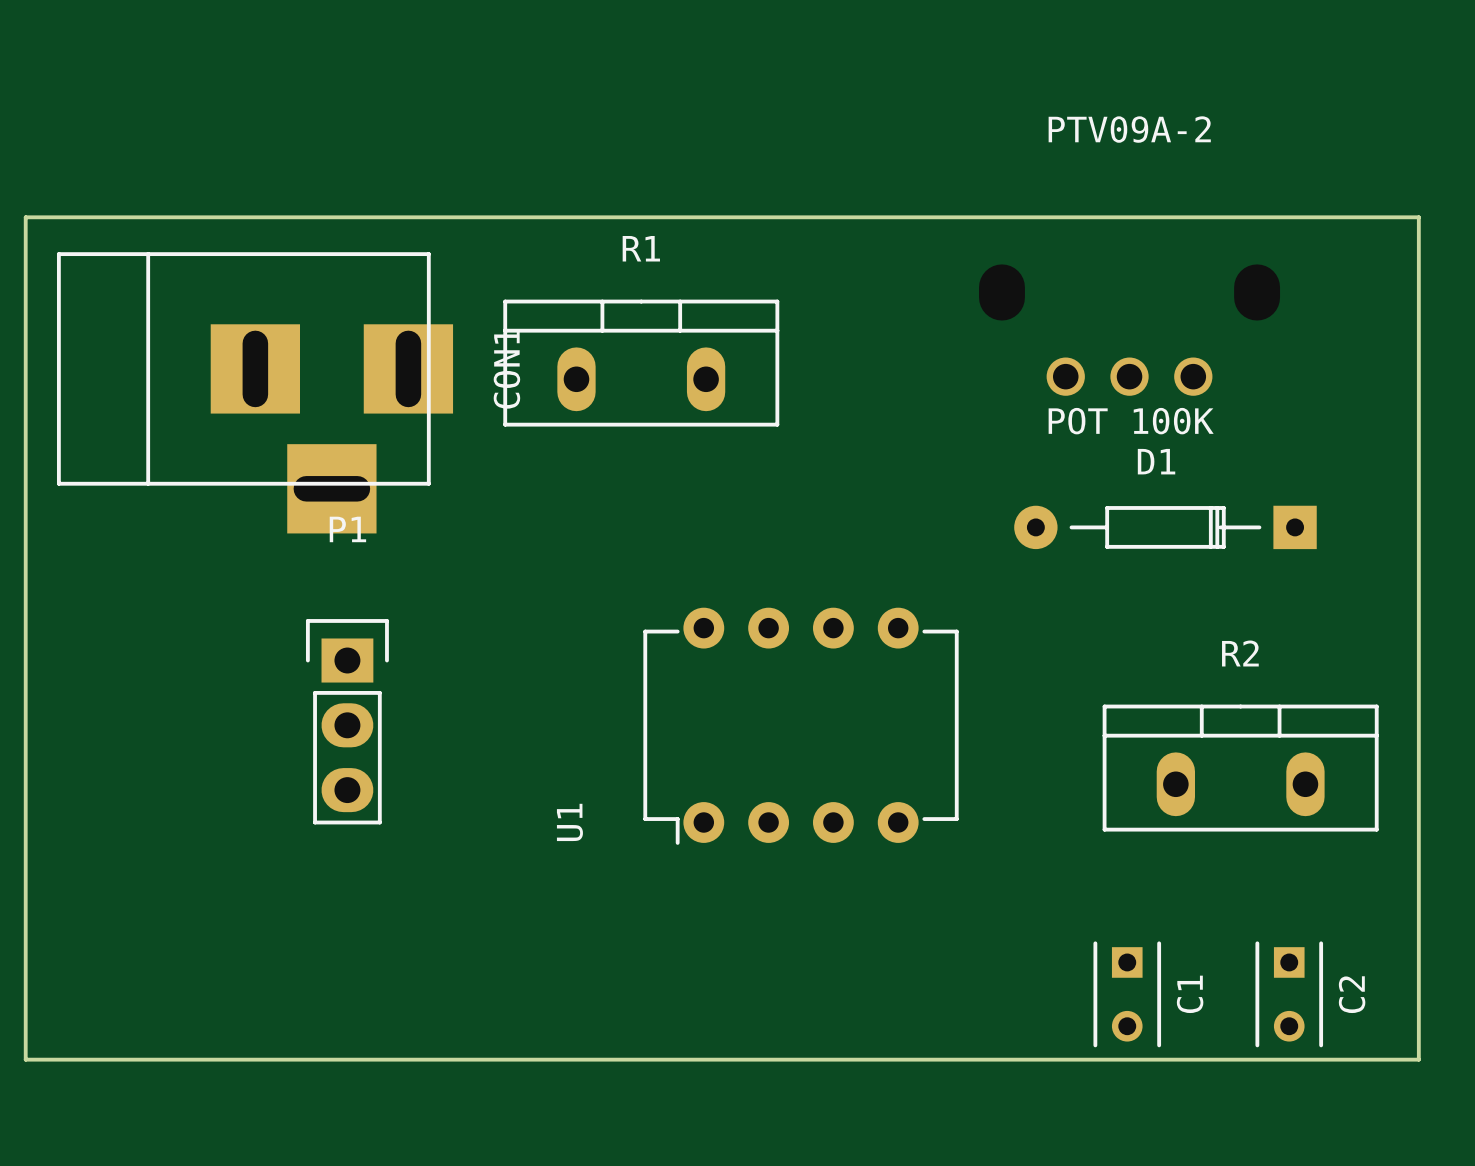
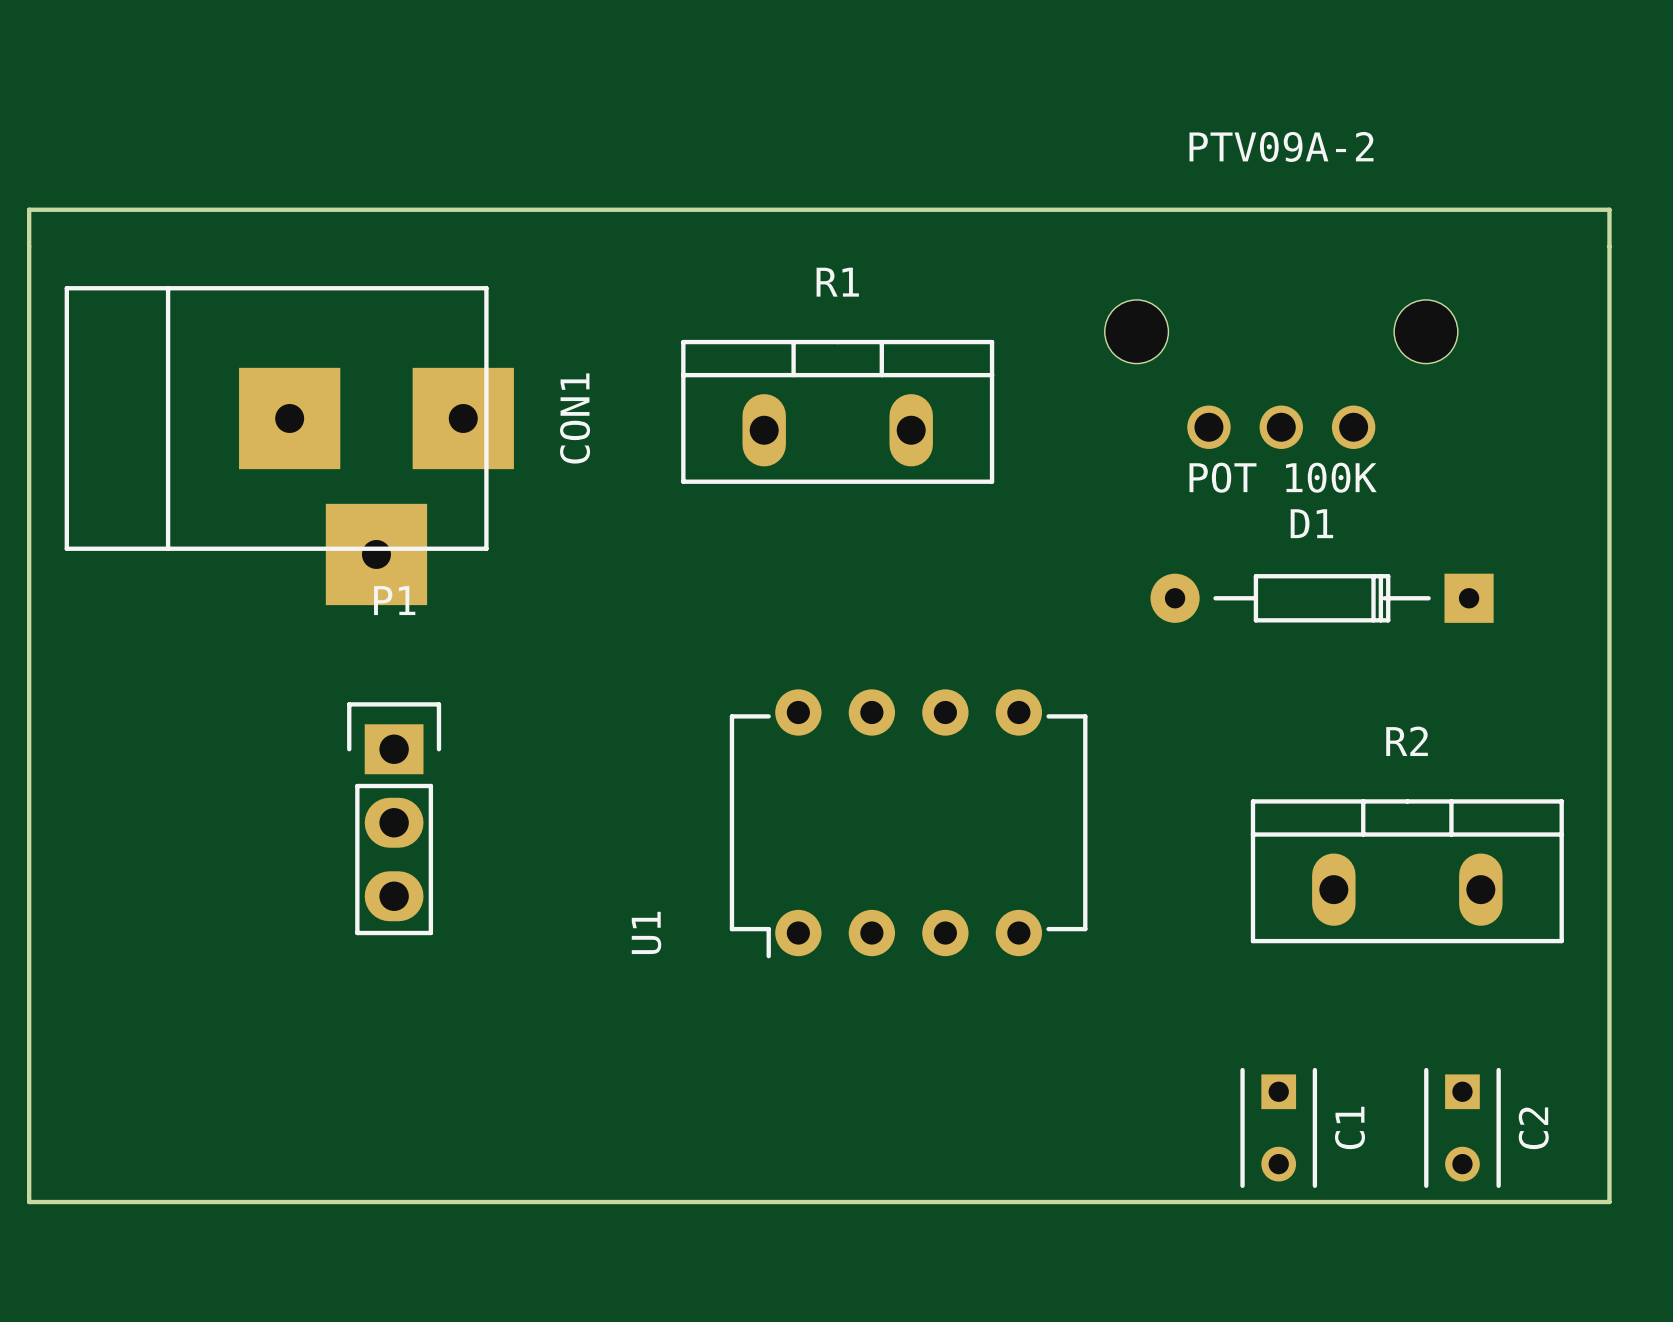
board edge: (25, 217) (1418, 217) -> (29, 246) (29, 209) (1609, 209) (1609, 246)
CON1 footprint: [56, 252, 454, 534] -> [64, 286, 514, 606]
PTV09A-2 footprint: [979, 264, 1281, 396] -> [1104, 299, 1458, 449]
R1 position: (641, 363) -> (837, 411)

